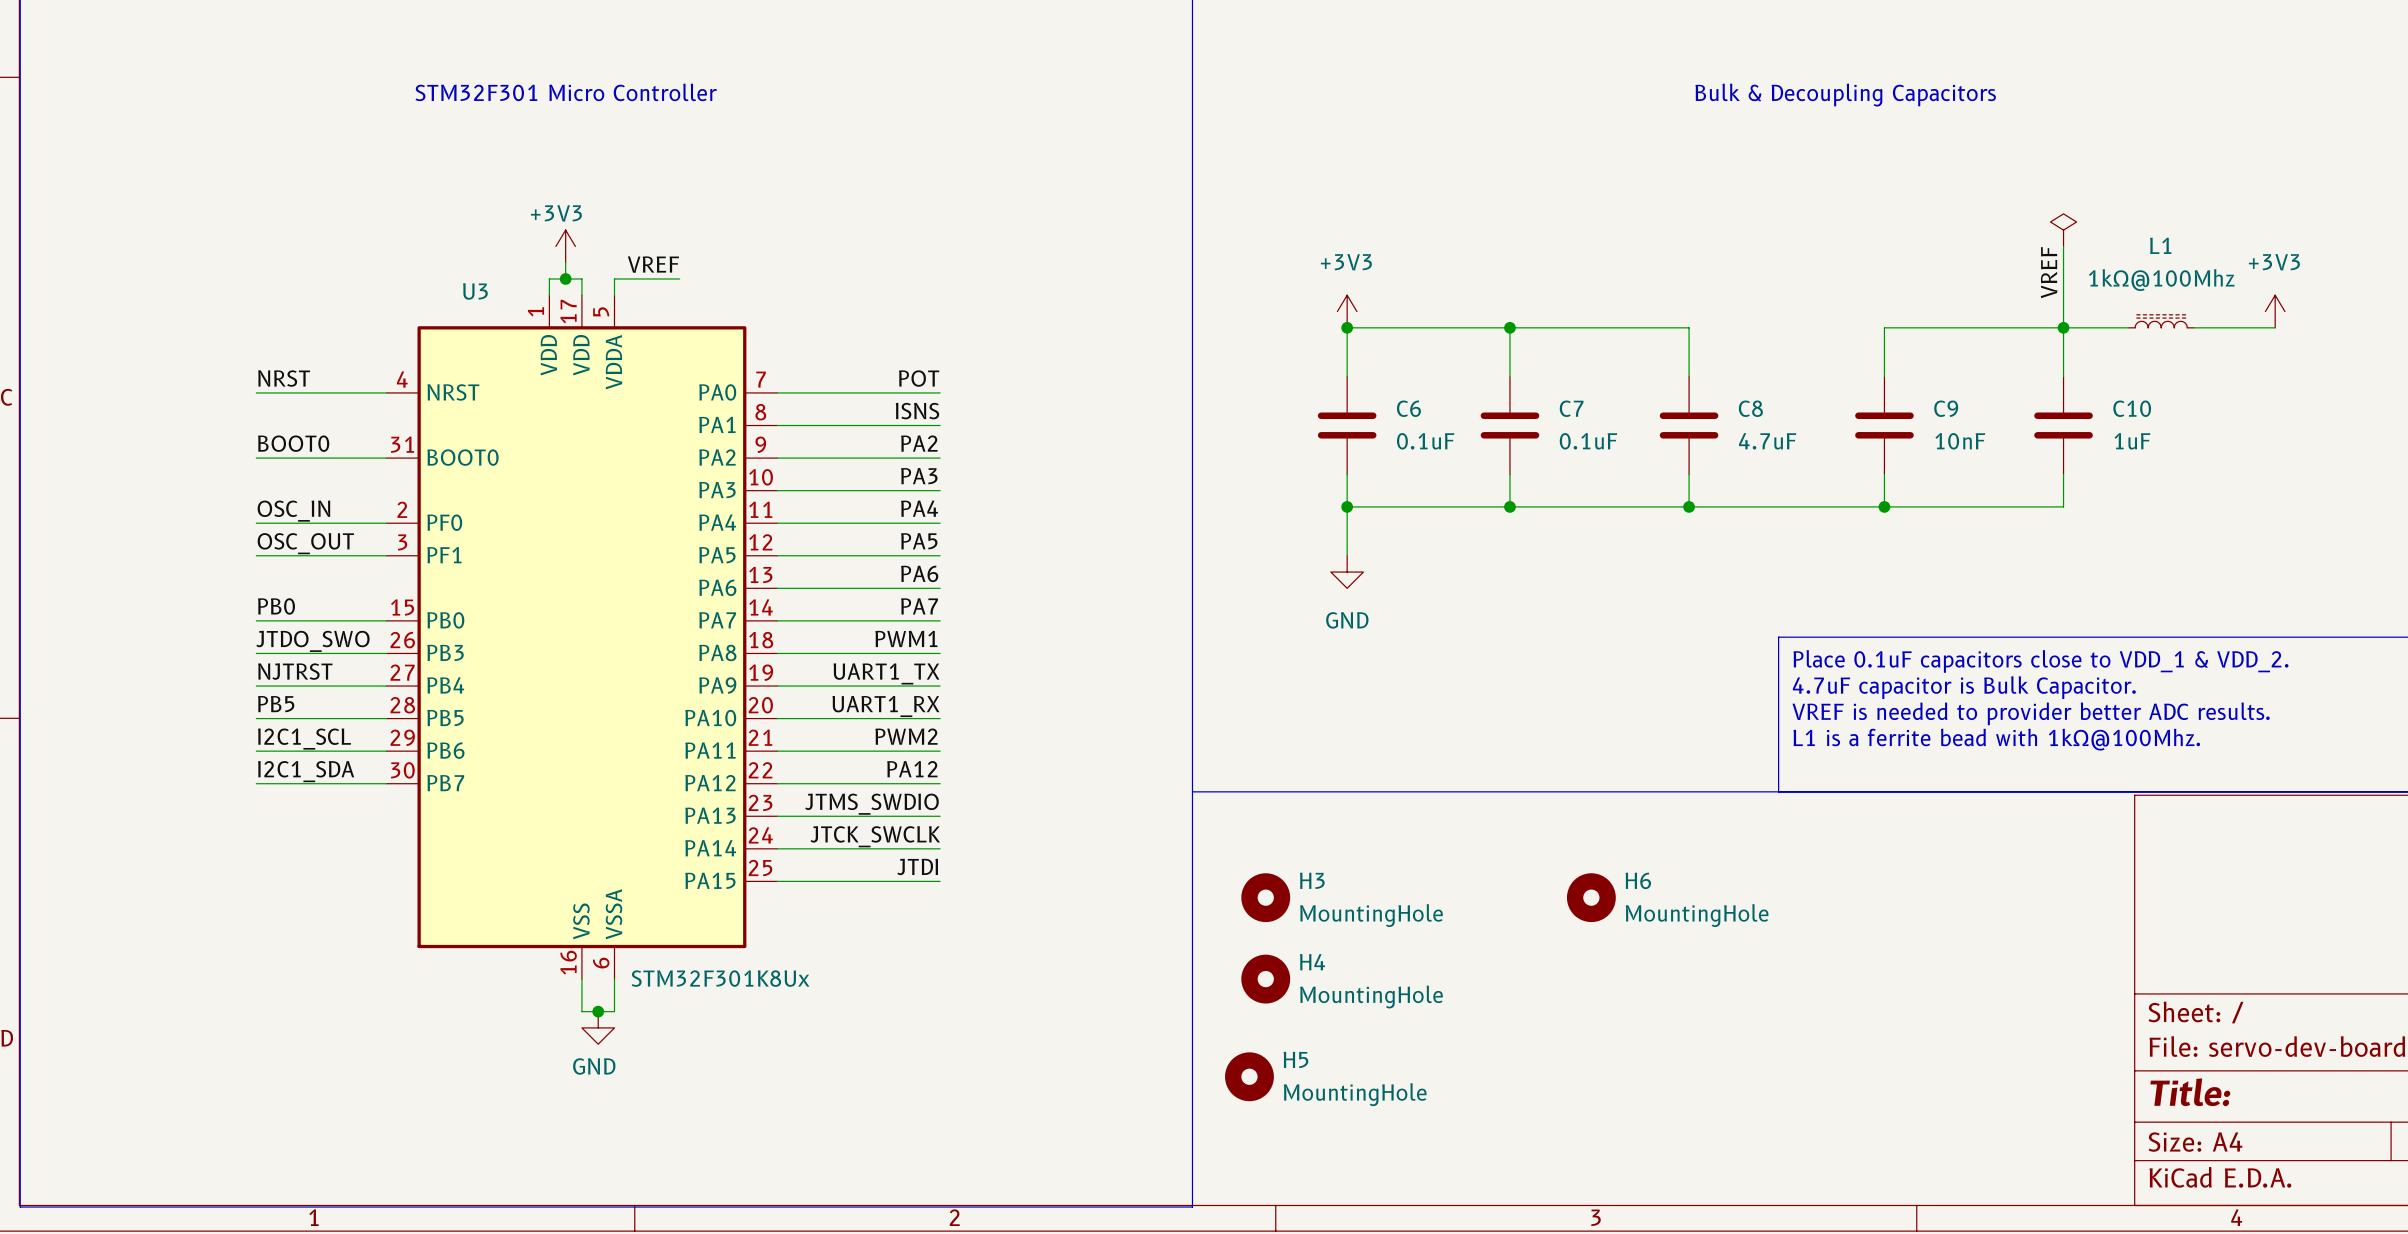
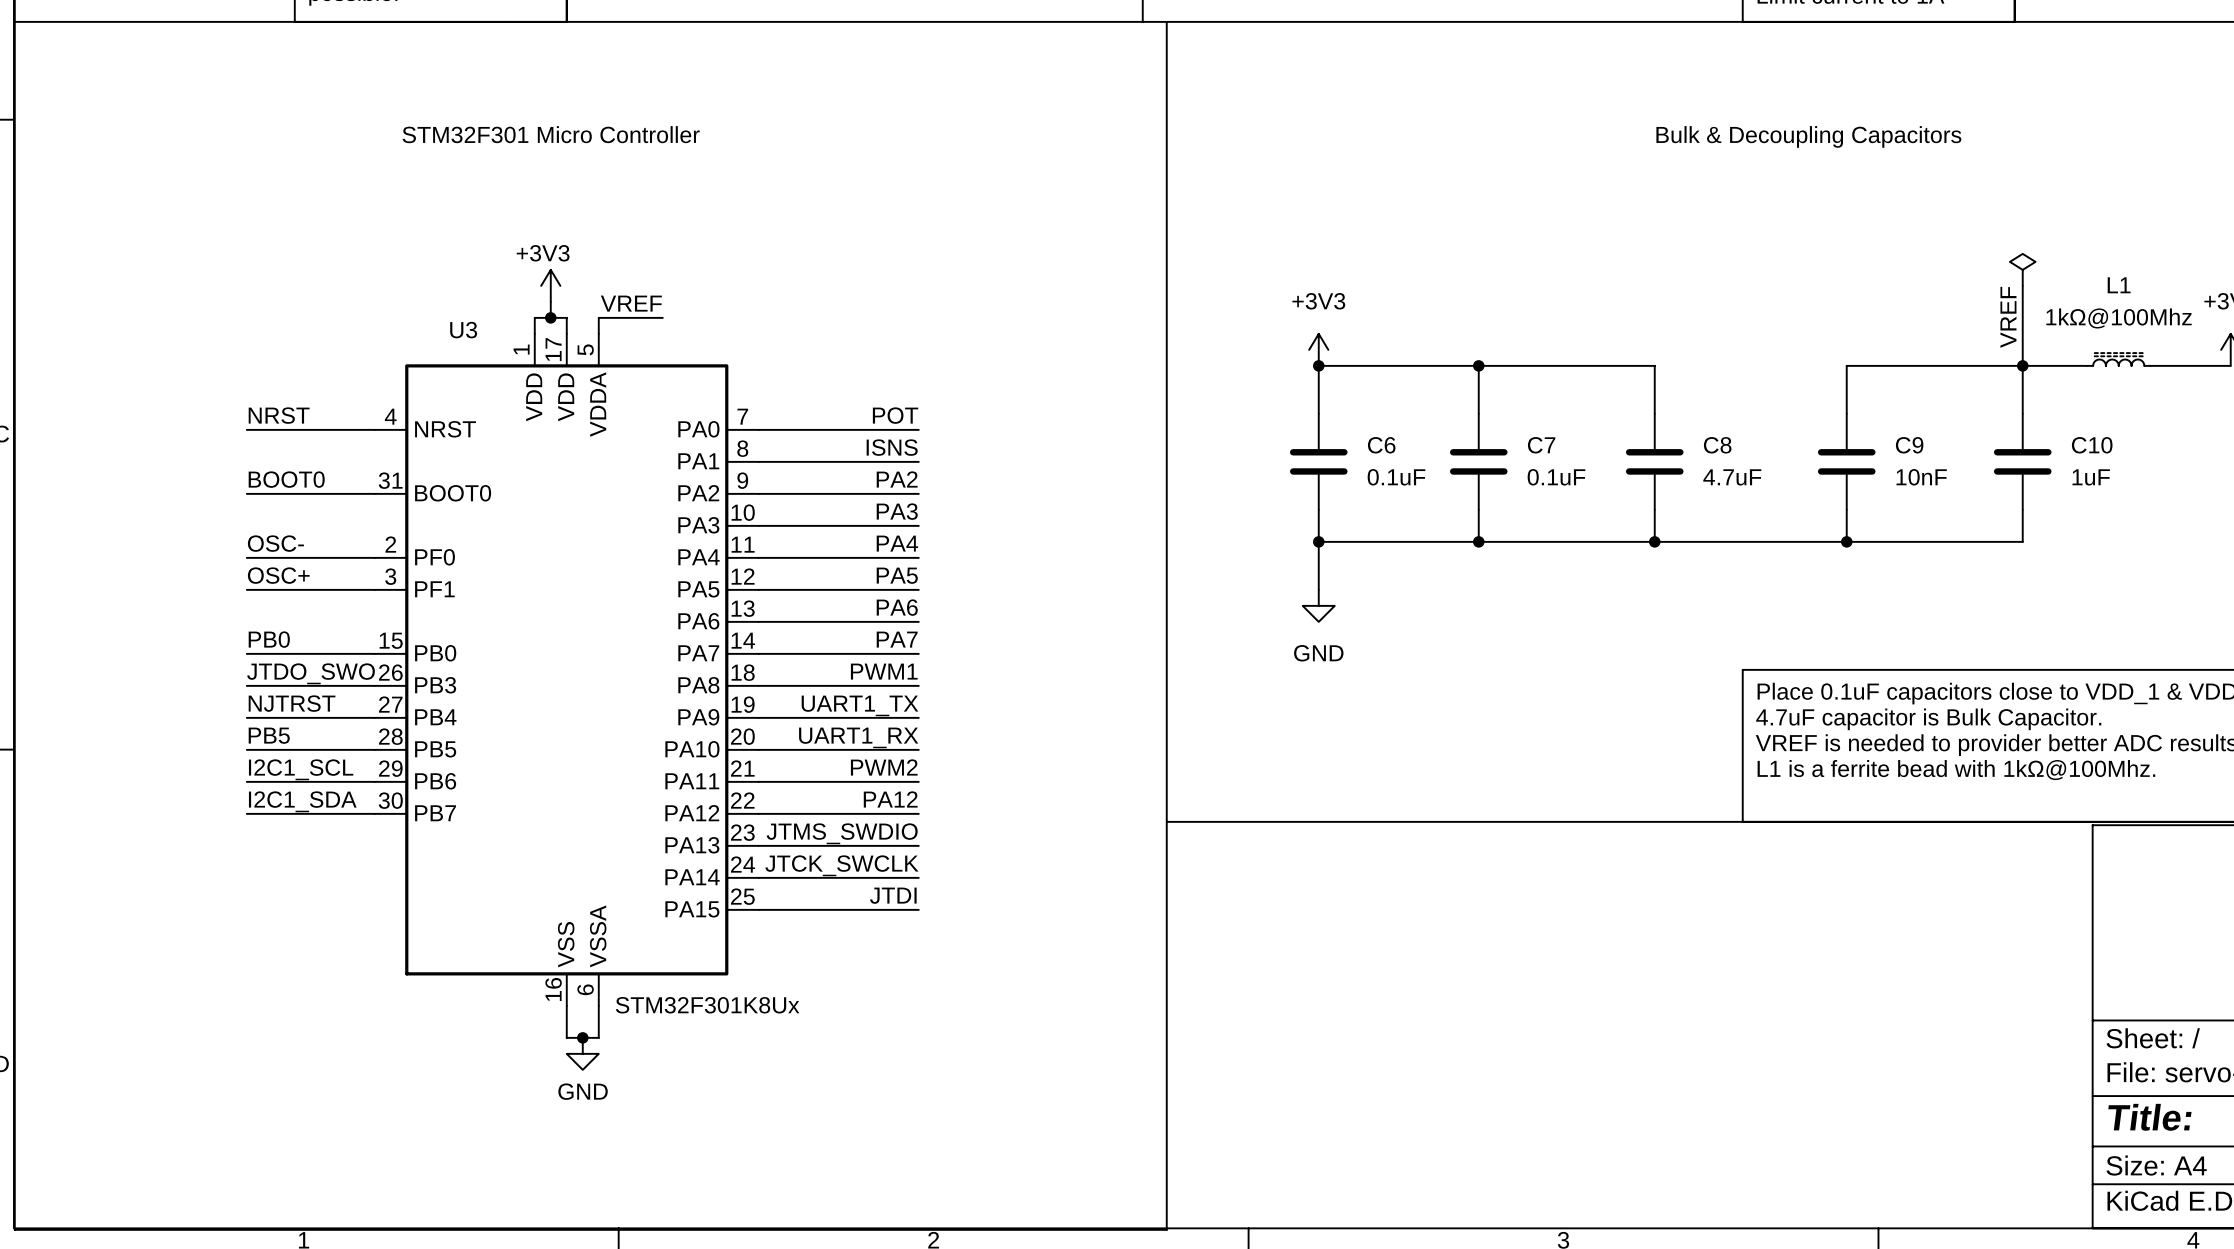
label: OSC_IN (293, 511) -> OSC- (275, 543)
label: OSC_OUT (305, 543) -> OSC+ (278, 575)
H3: MountingHole (1265, 897) -> none
H6: MountingHole (1591, 897) -> none
H4: MountingHole (1265, 979) -> none
H5: MountingHole (1249, 1076) -> none

